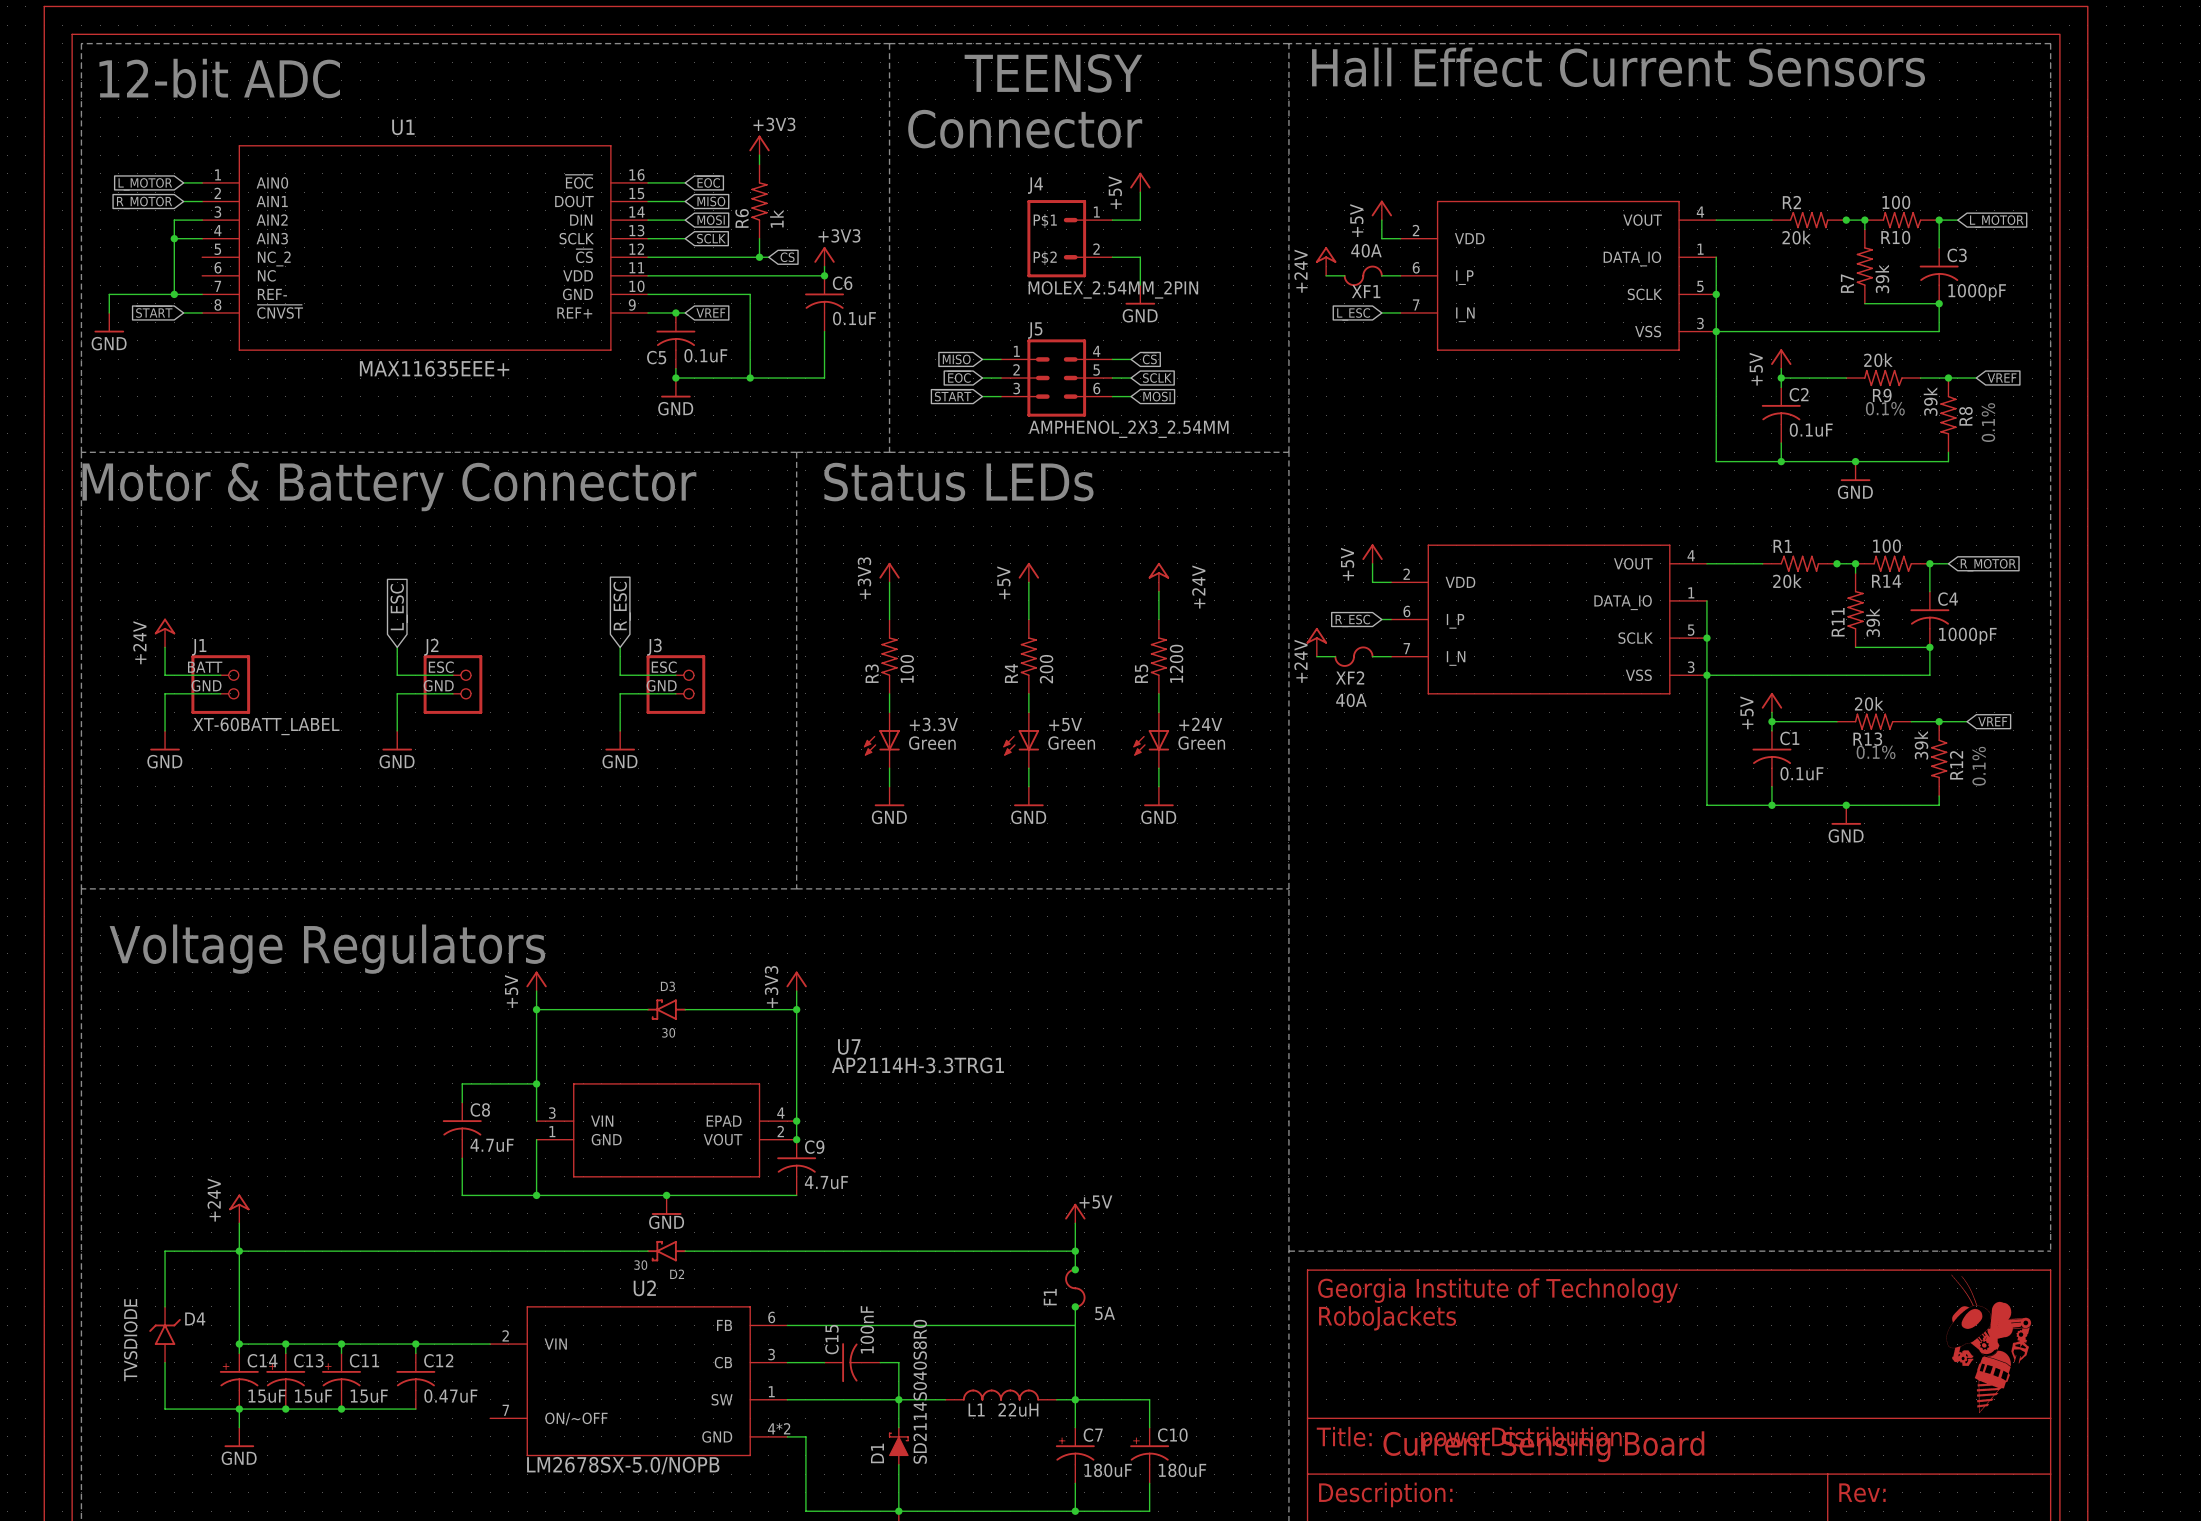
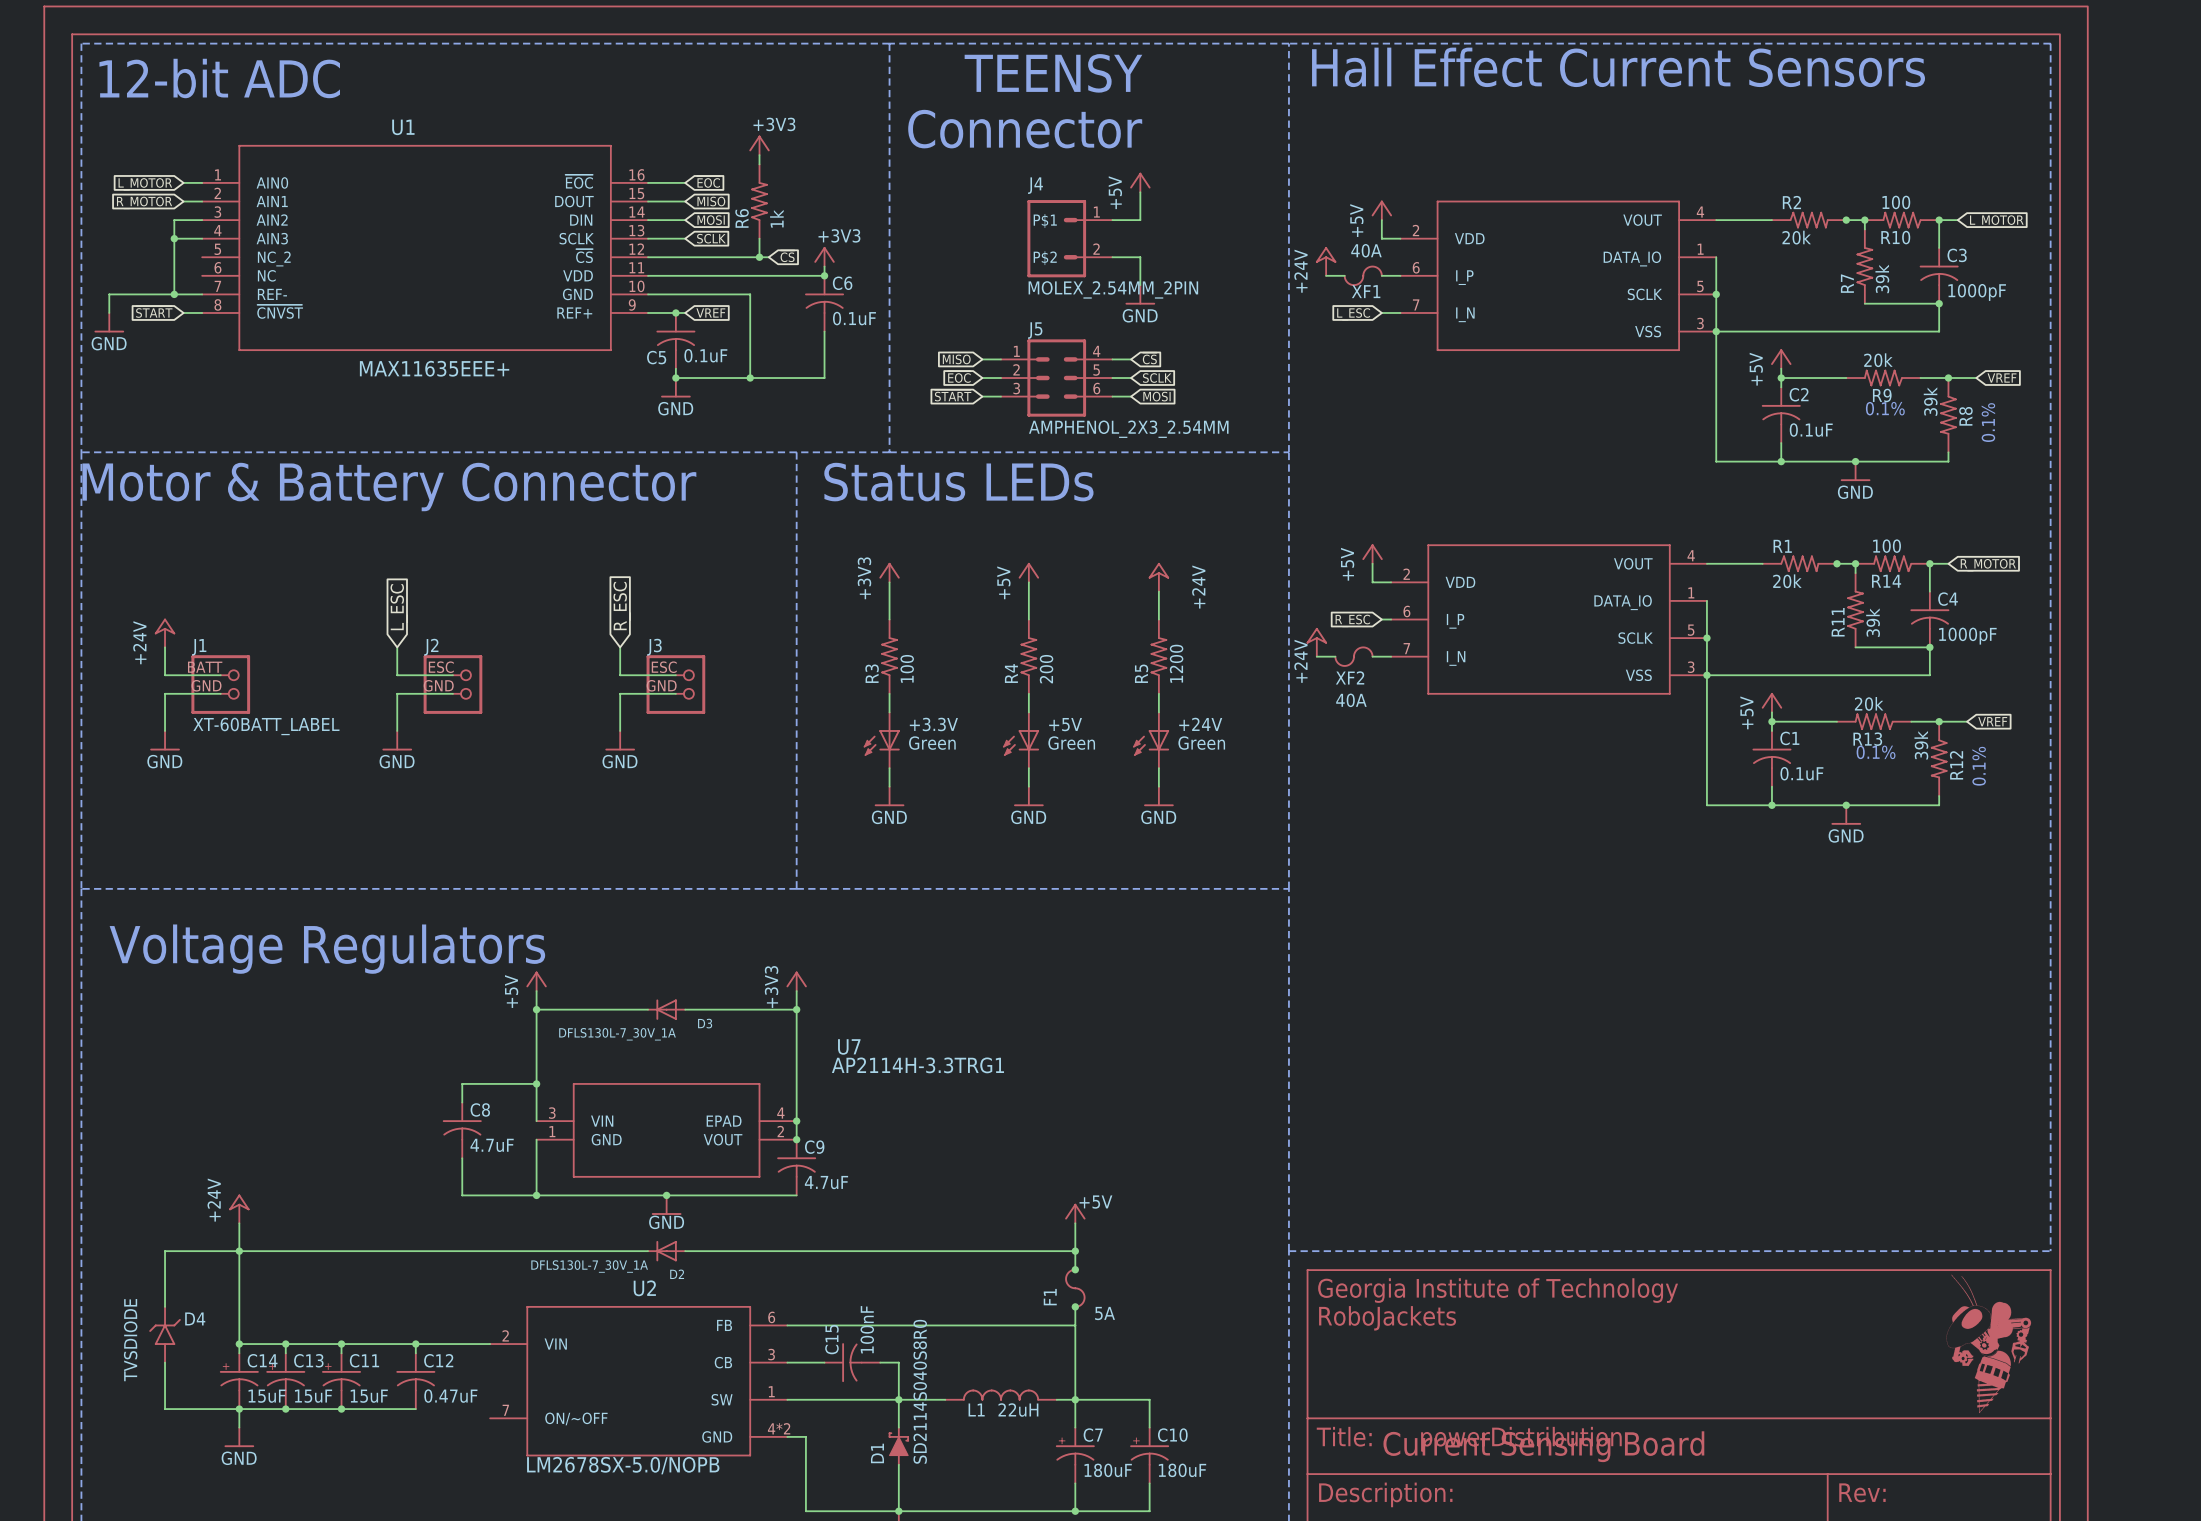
D3 name position: D3 (667, 986) -> D3 (705, 1023)
D3 symbol: [647, 999, 687, 1020] -> [648, 999, 686, 1020]
D3 value: 30 (668, 1032) -> DFLS130L-7_30V_1A (617, 1034)
D2 symbol: [647, 1240, 687, 1262] -> [648, 1240, 686, 1262]
D2 value: 30 (640, 1265) -> DFLS130L-7_30V_1A (589, 1266)

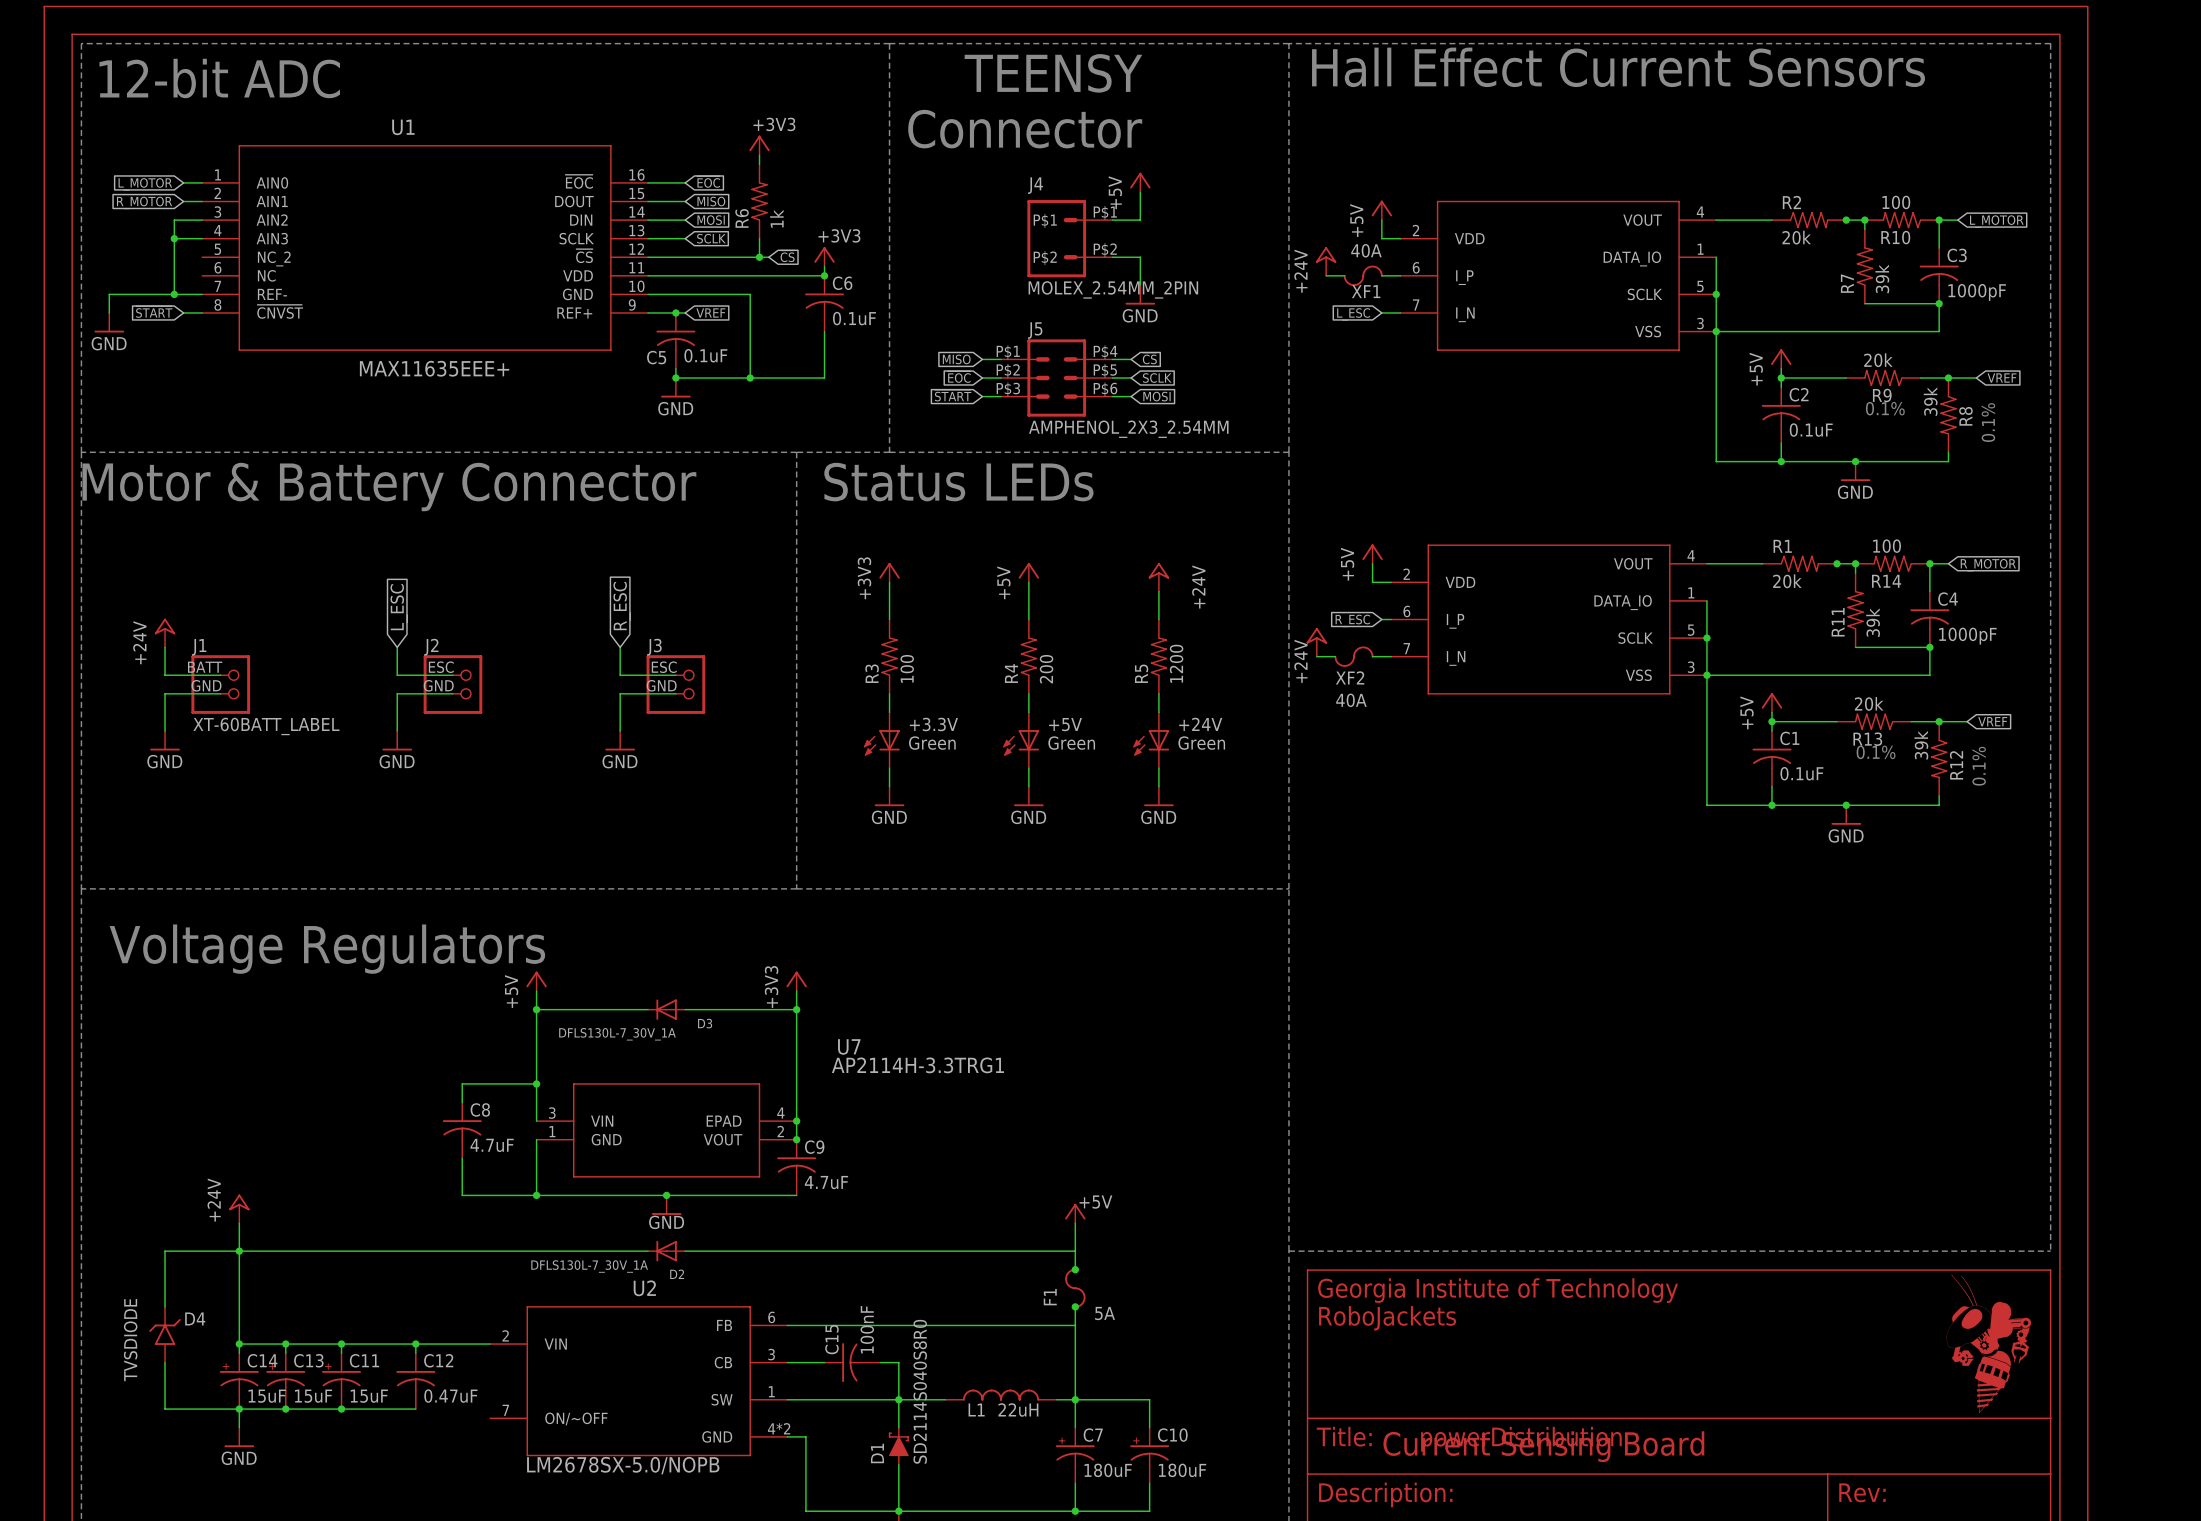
J4 pin number: 1 (1096, 212) -> P$1 (1105, 212)
J4 pin number: 2 (1096, 249) -> P$2 (1105, 250)
J5 pin number: 1 (1016, 351) -> P$1 (1008, 352)
J5 pin number: 4 (1096, 351) -> P$4 (1105, 352)
J5 pin number: 2 (1016, 369) -> P$2 (1008, 370)
J5 pin number: 5 (1096, 370) -> P$5 (1105, 370)
J5 pin number: 3 (1016, 388) -> P$3 (1008, 389)
J5 pin number: 6 (1096, 388) -> P$6 (1105, 389)
junction: (1075, 1251) -> none

